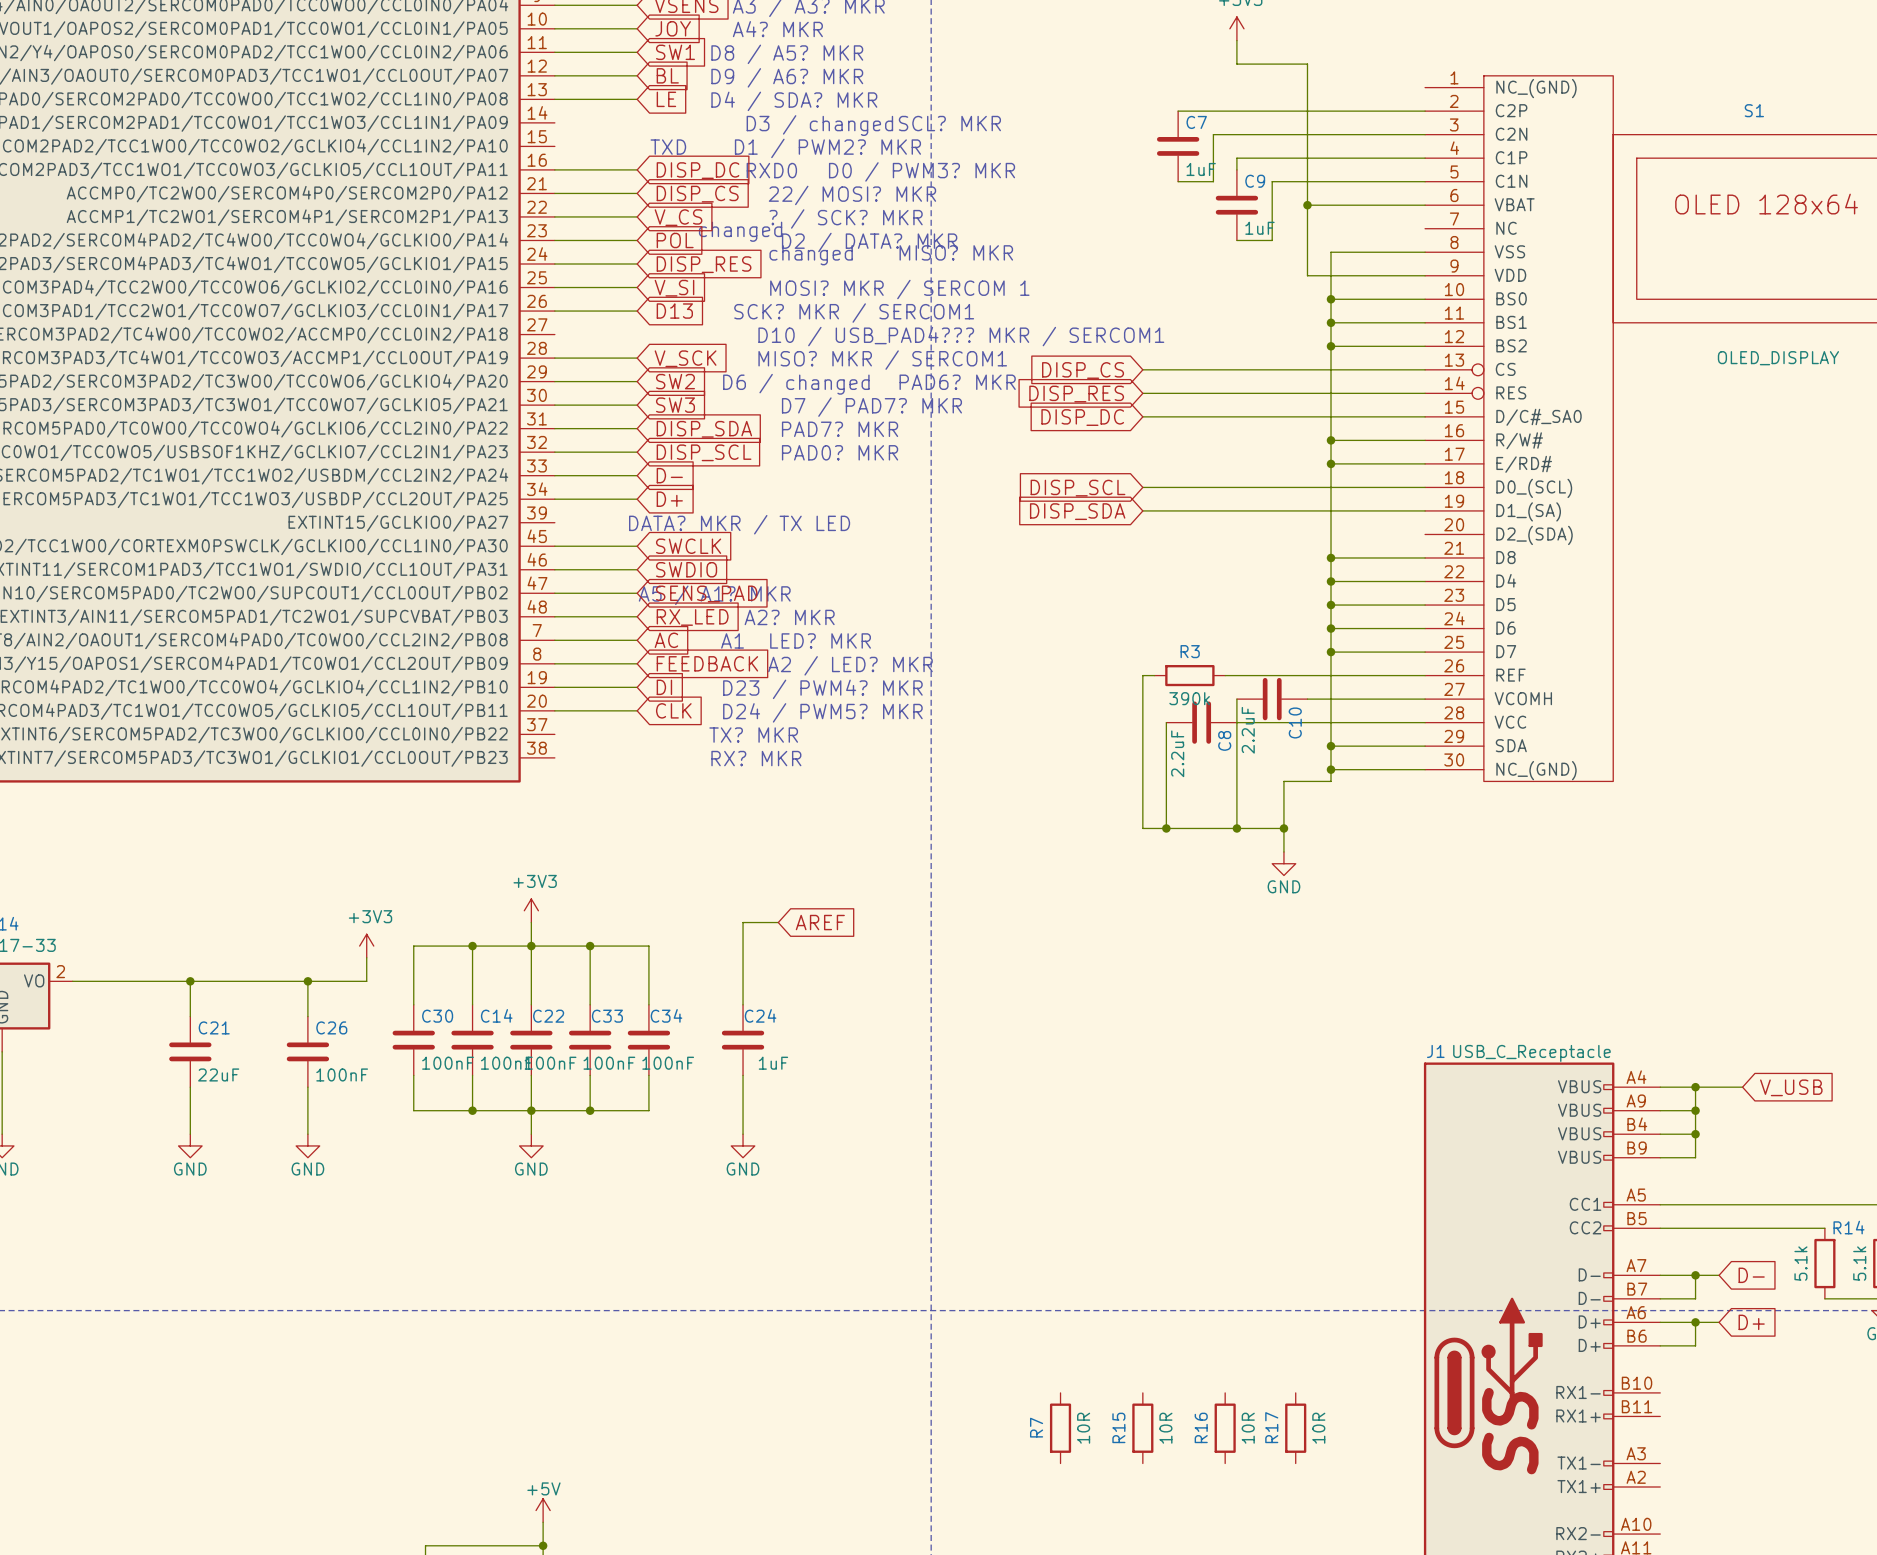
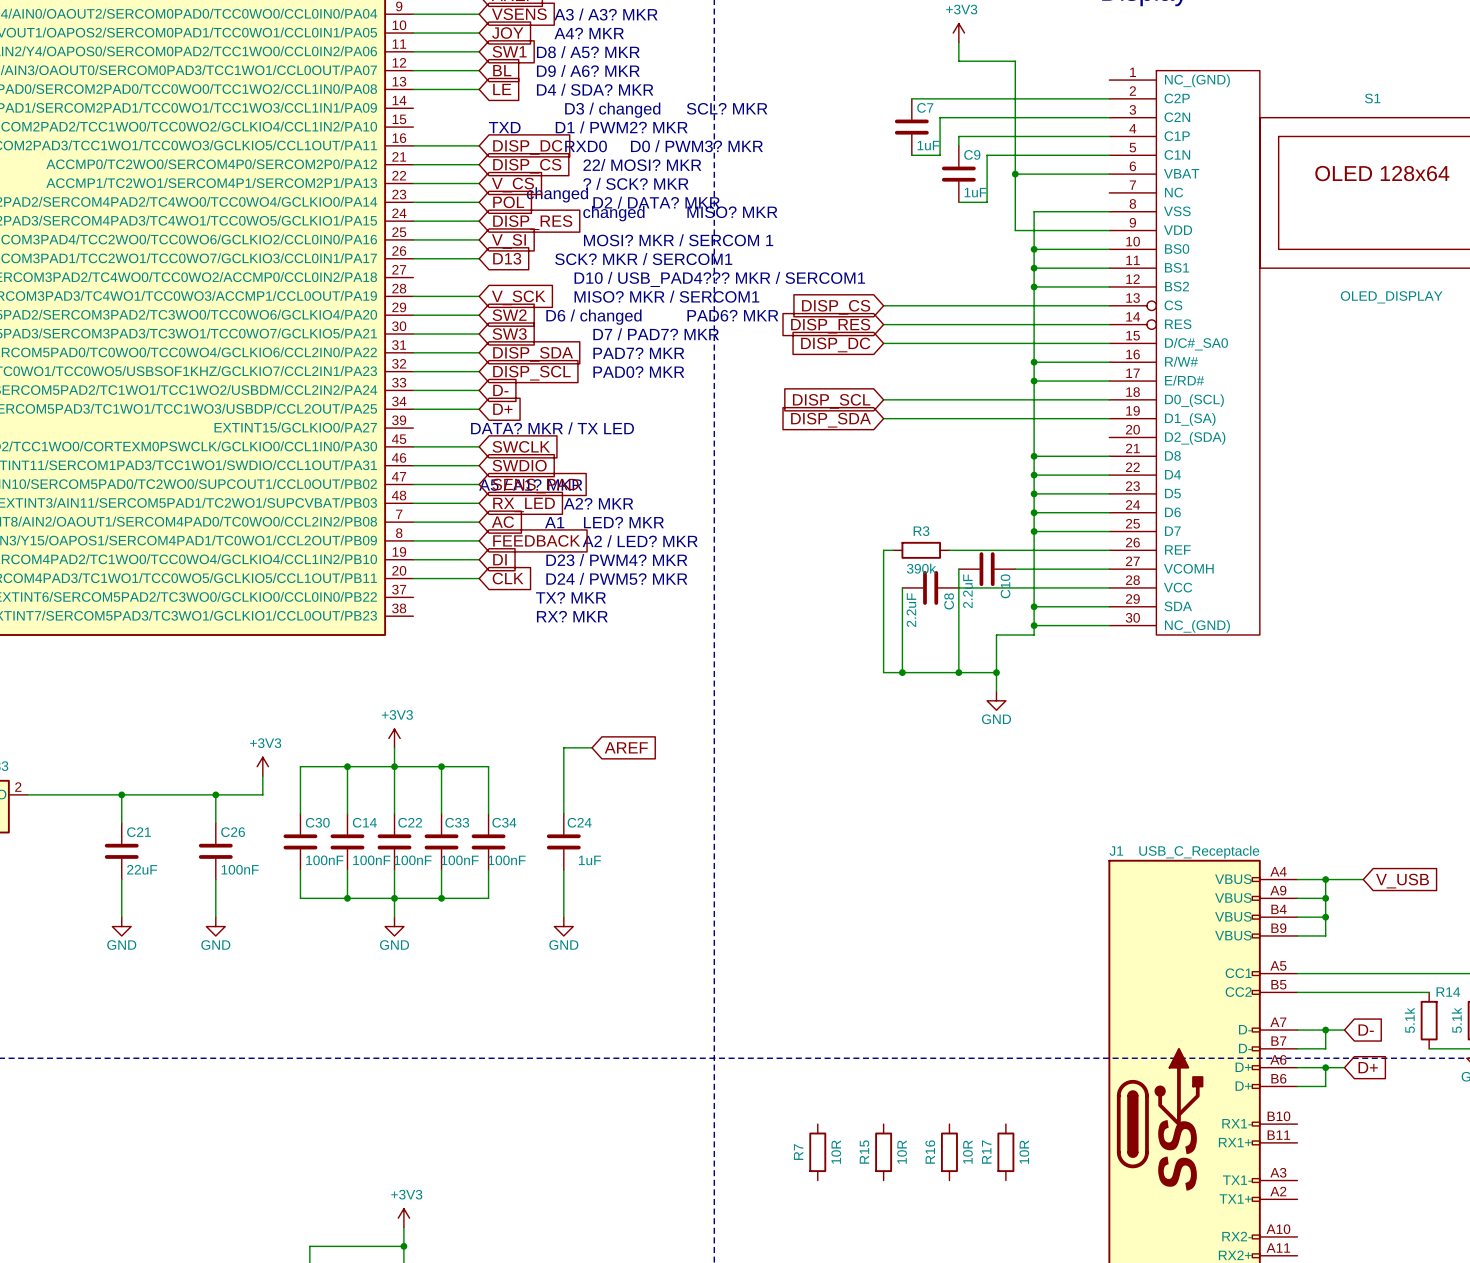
power symbol: +5V (543, 1510) -> +3V3 (403, 1218)

